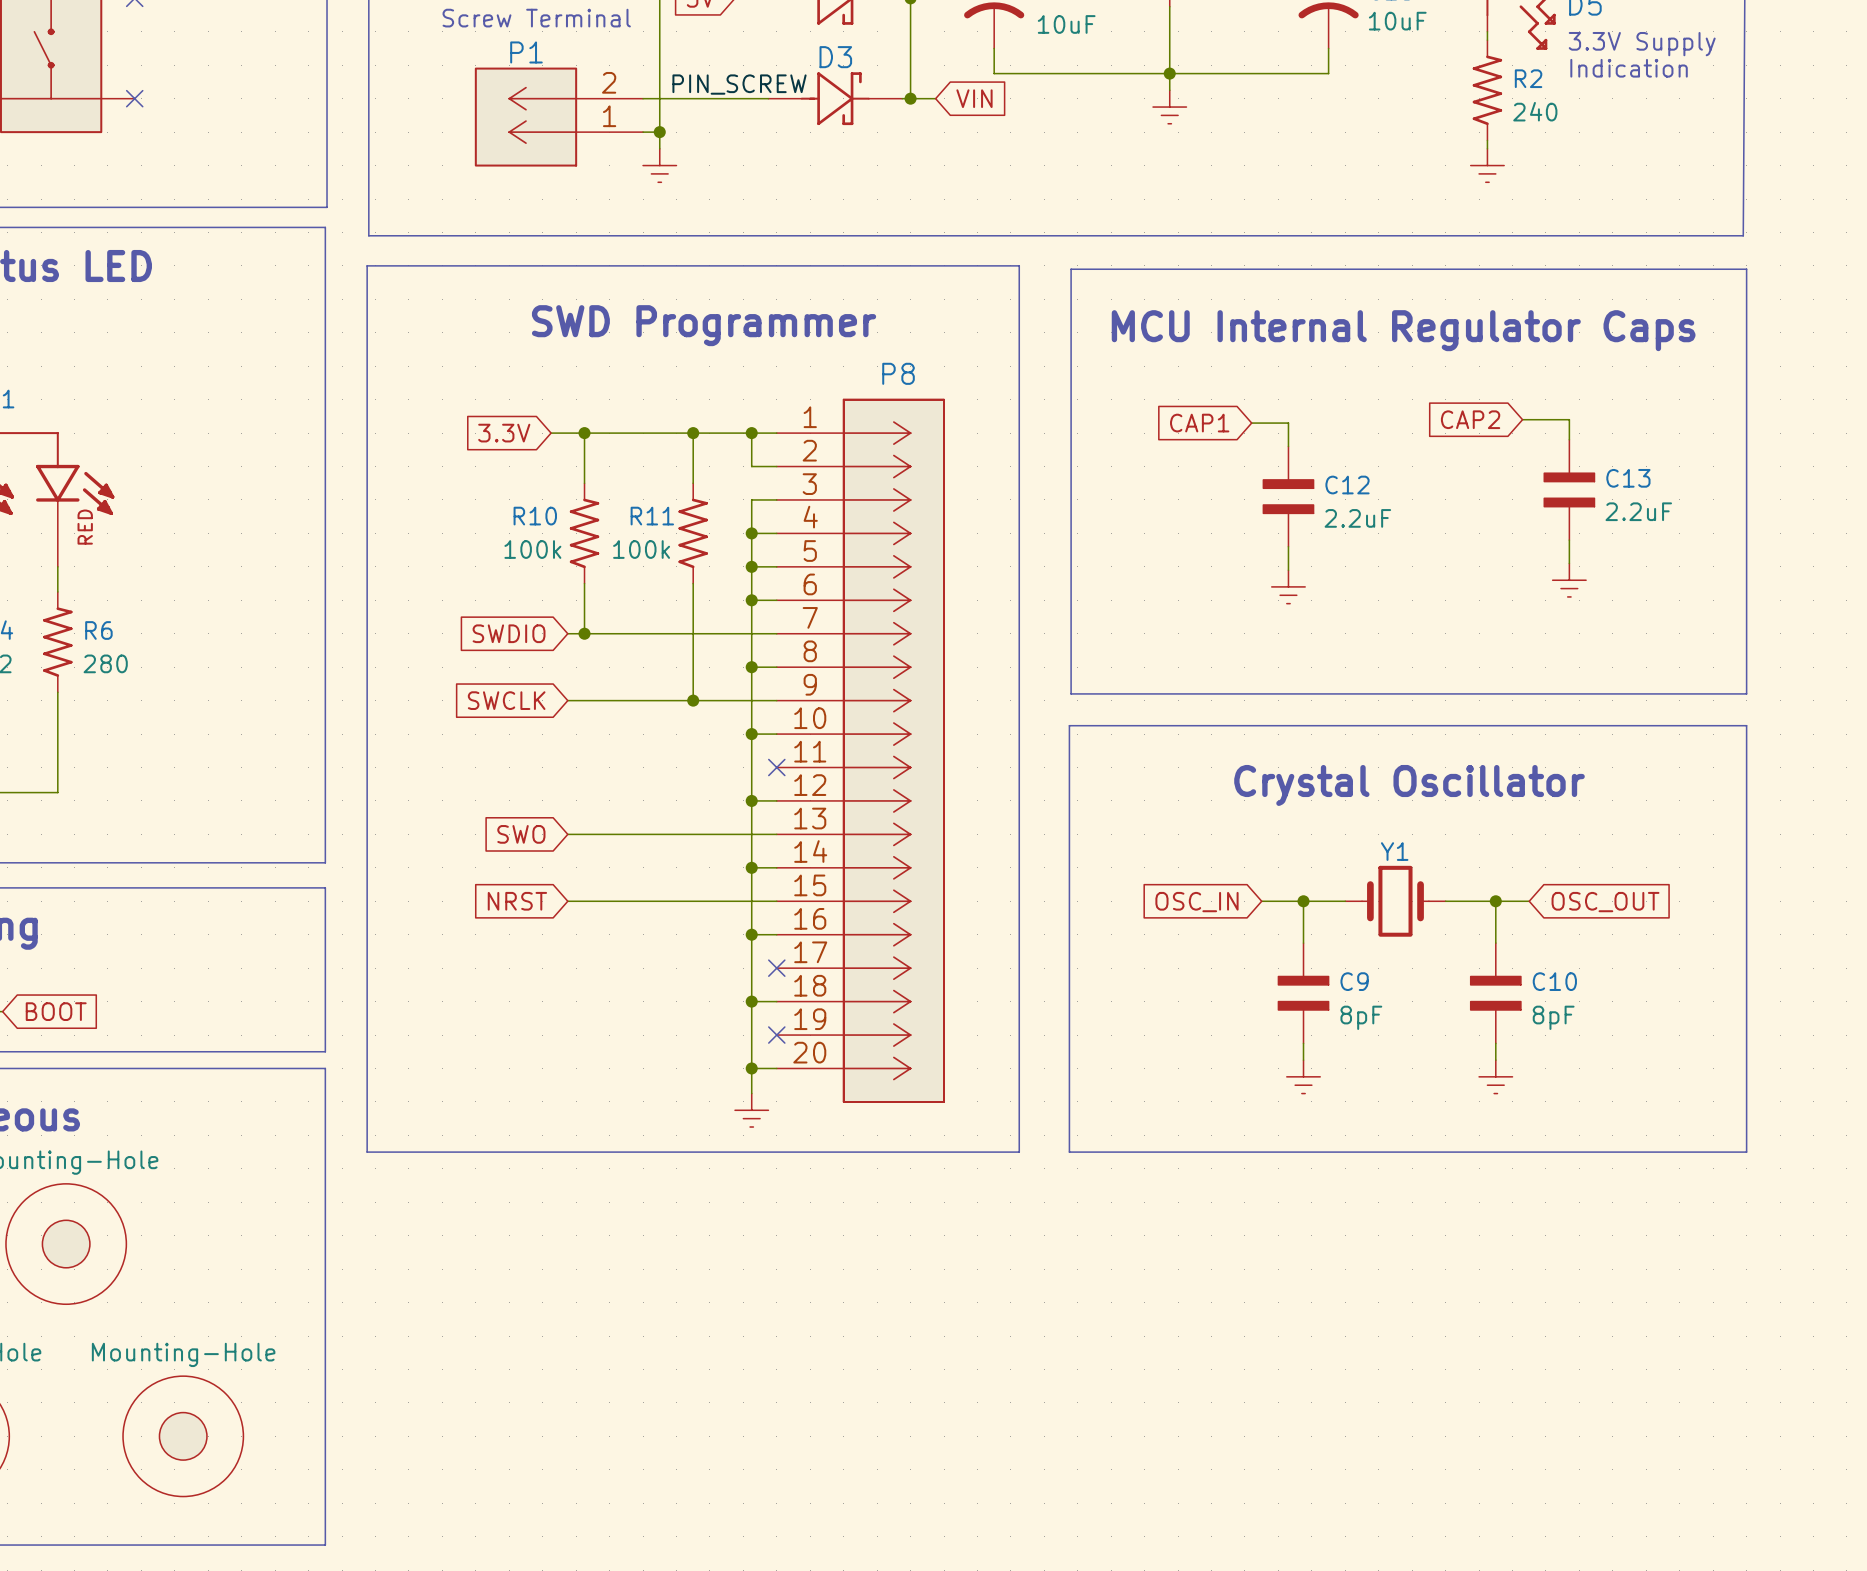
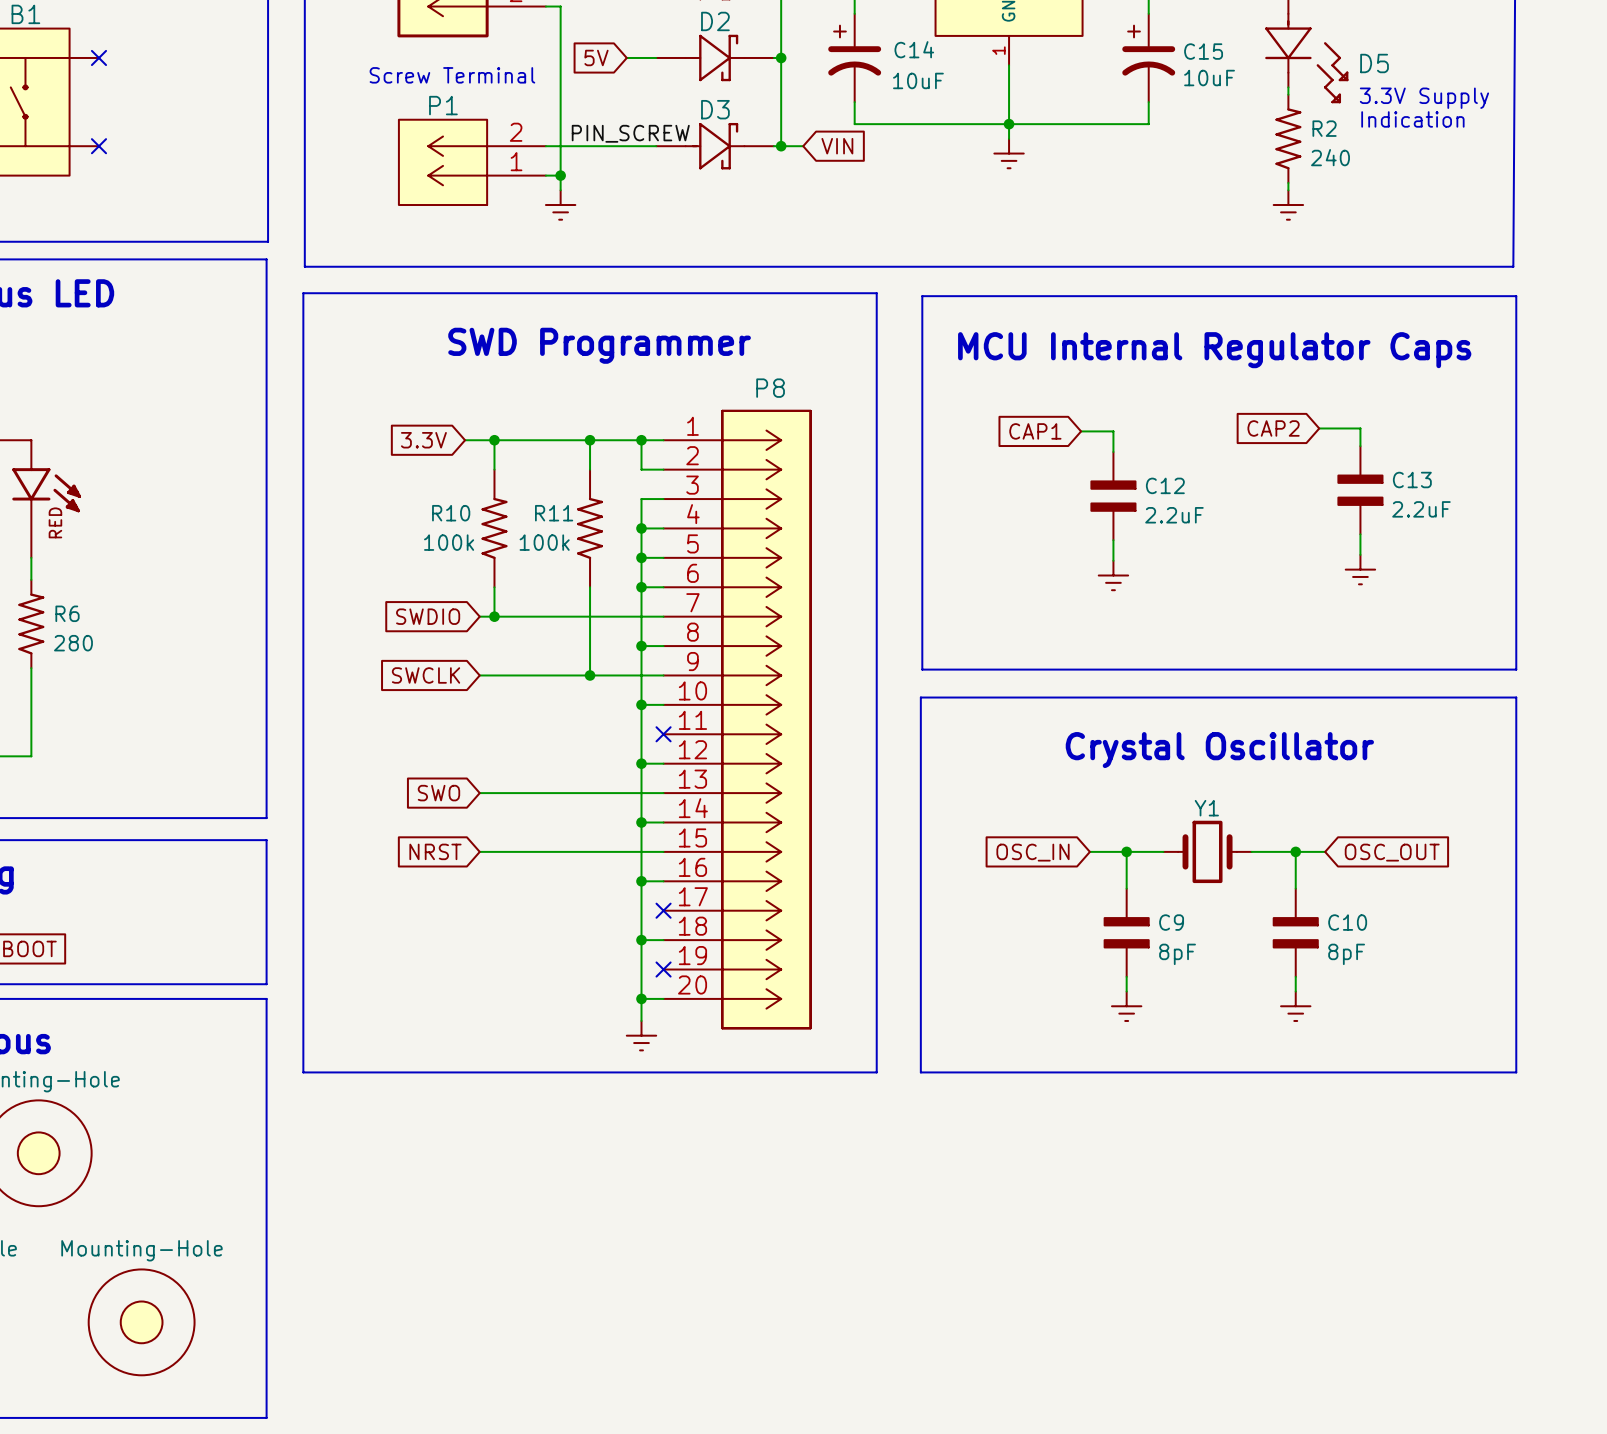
R10 symbol: [569, 483, 600, 584] -> [481, 469, 508, 588]
R11 symbol: [678, 483, 708, 584] -> [577, 469, 603, 588]

